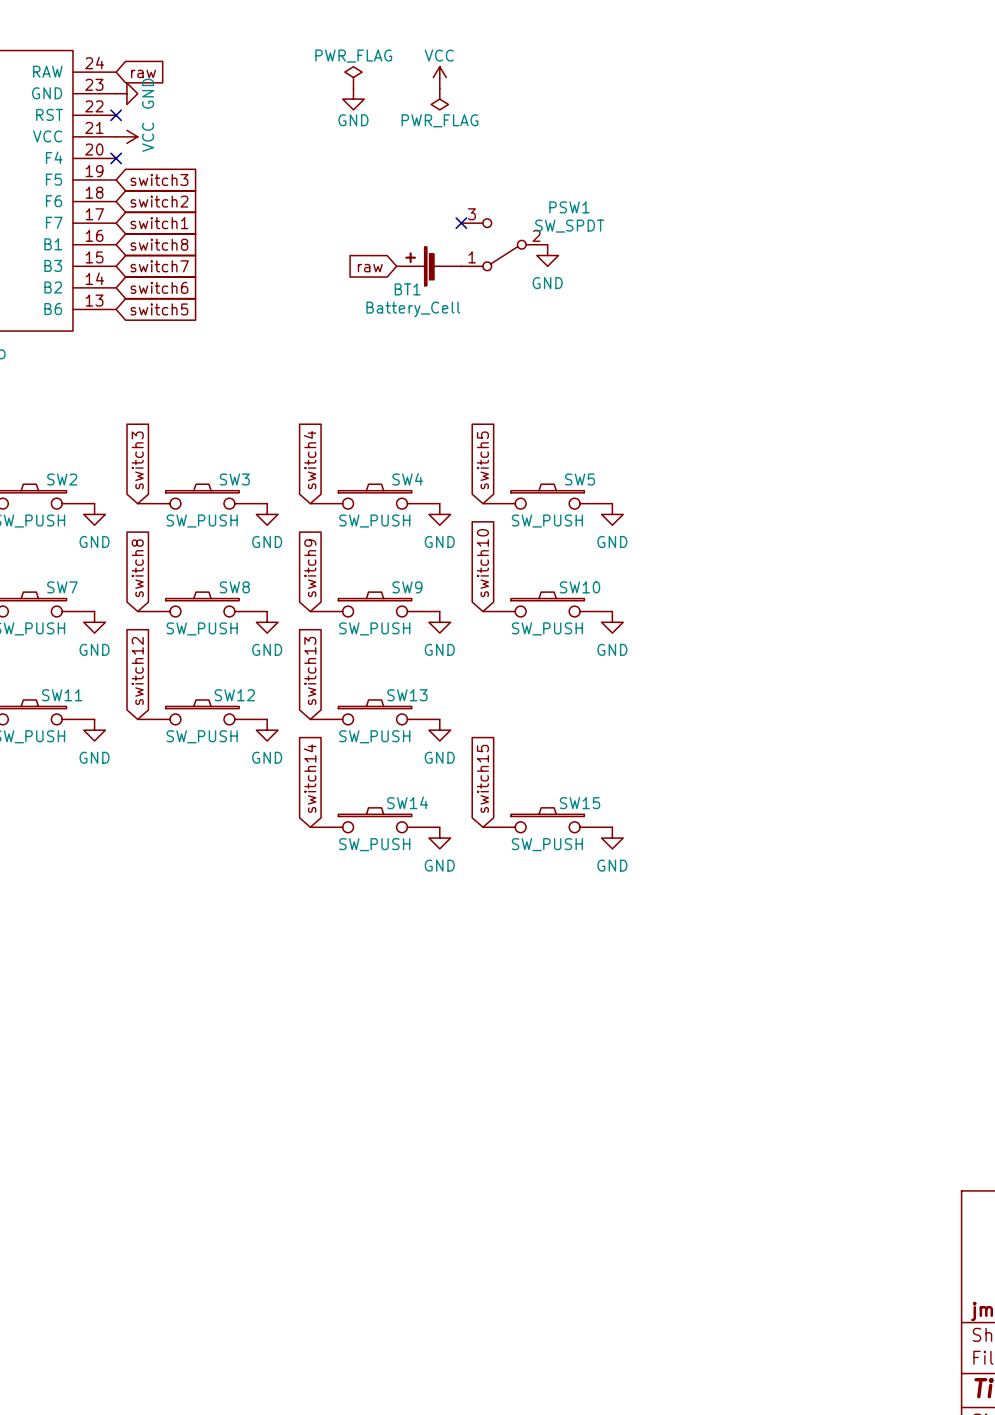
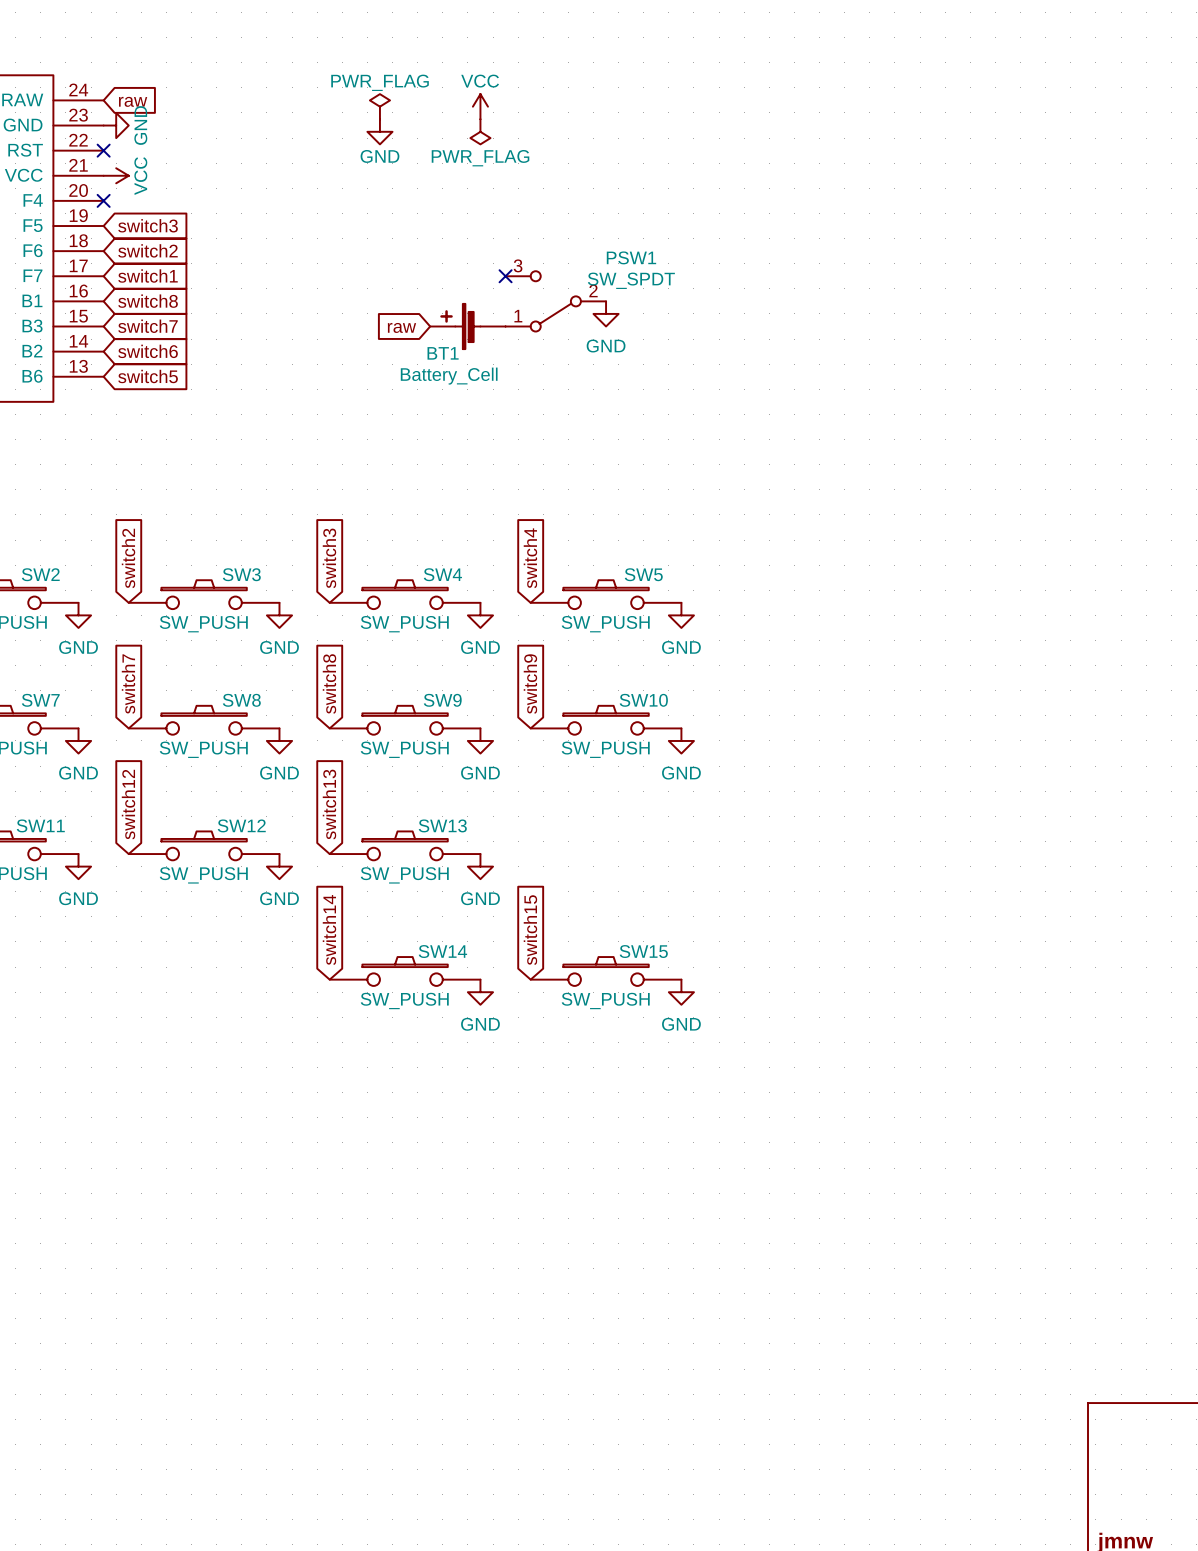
global label: switch3 (137, 460) -> switch2 (128, 558)
global label: switch4 (310, 460) -> switch3 (329, 558)
global label: switch5 (482, 460) -> switch4 (530, 558)
global label: switch10 (482, 563) -> switch9 (530, 684)
global label: switch8 (137, 568) -> switch7 (128, 684)
global label: switch9 (310, 568) -> switch8 (329, 684)

